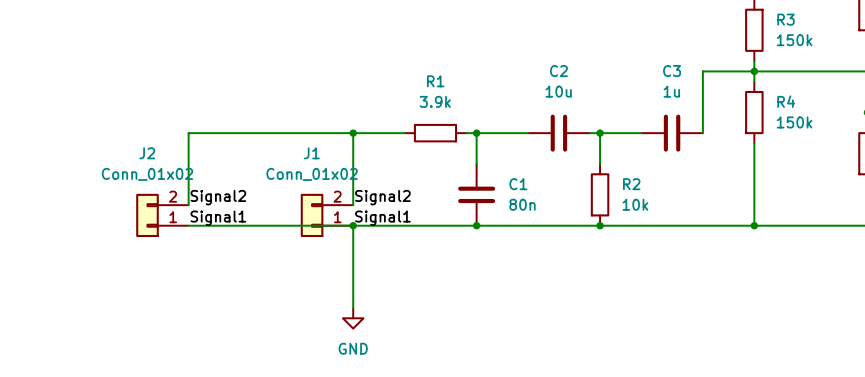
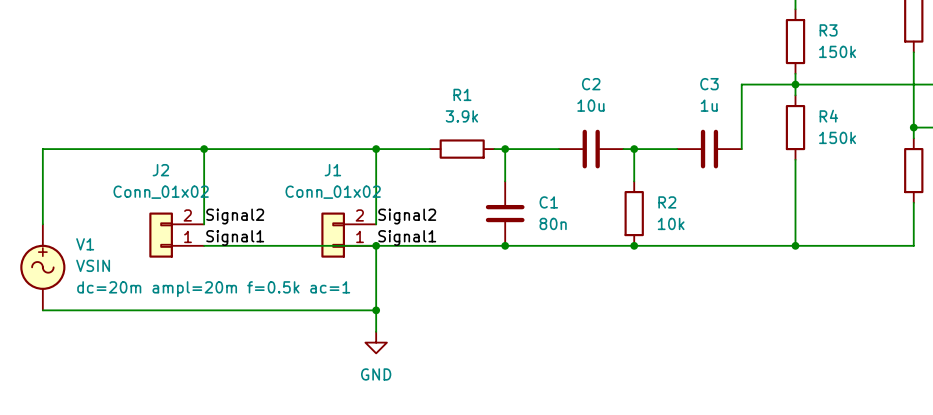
wire: none -> (204, 149) (42, 149) (42, 224)
junction: none -> (204, 149)
V1: none -> VSIN (42, 267)
wire: none -> (42, 310) (376, 310)
junction: none -> (376, 310)

